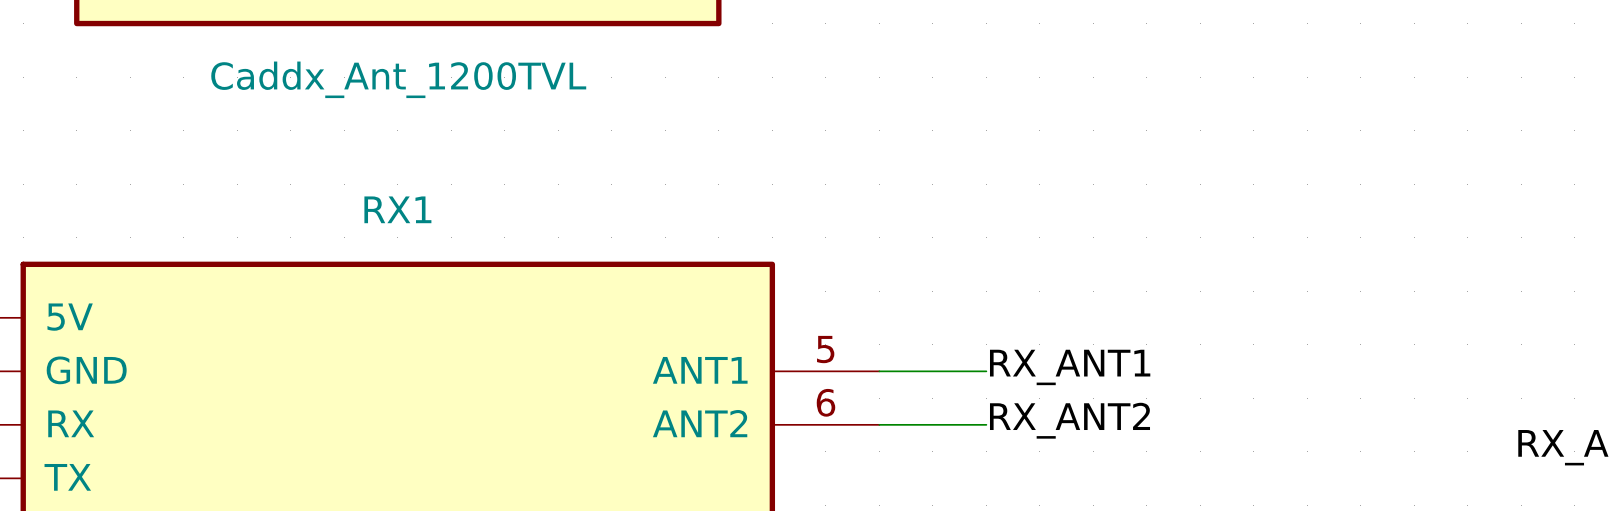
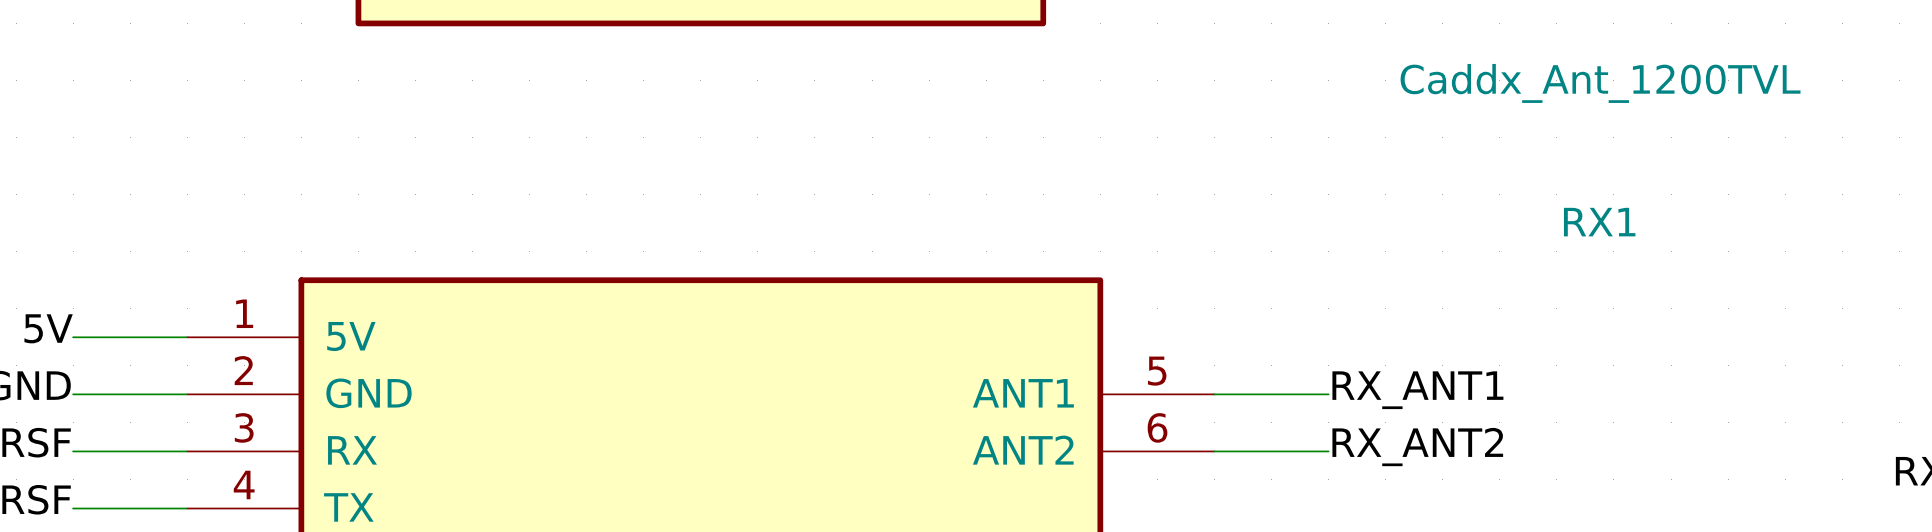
part value position: Caddx_Ant_1200TVL (398, 79) -> Caddx_Ant_1200TVL (1600, 83)
RX1 name position: RX1 (397, 209) -> RX1 (1599, 222)

